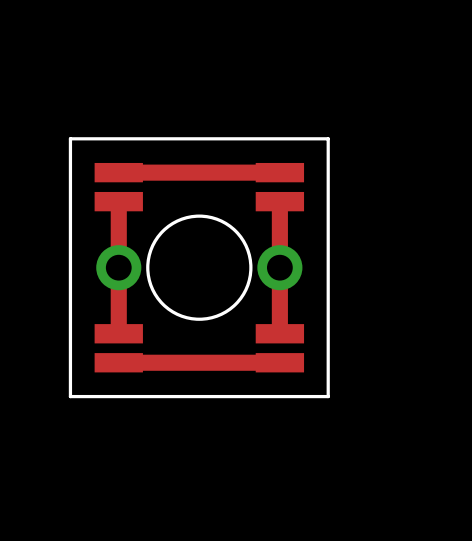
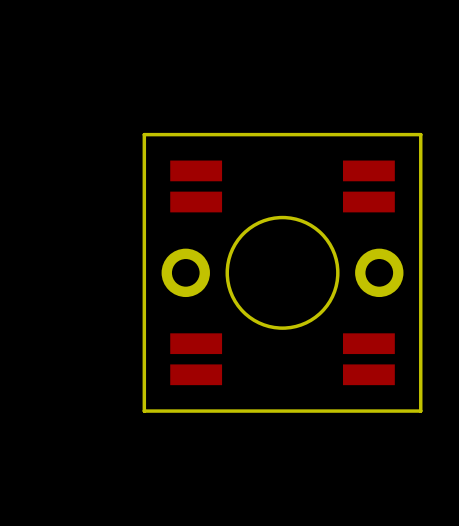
top track: (279, 172) (118, 172) -> none
top track: (118, 201) (118, 333) -> none
top track: (279, 201) (279, 333) -> none
part: none -> (185, 272)
via: (118, 267) -> none
via: (279, 267) -> none
part: none -> (379, 272)
top track: (279, 362) (118, 362) -> none

